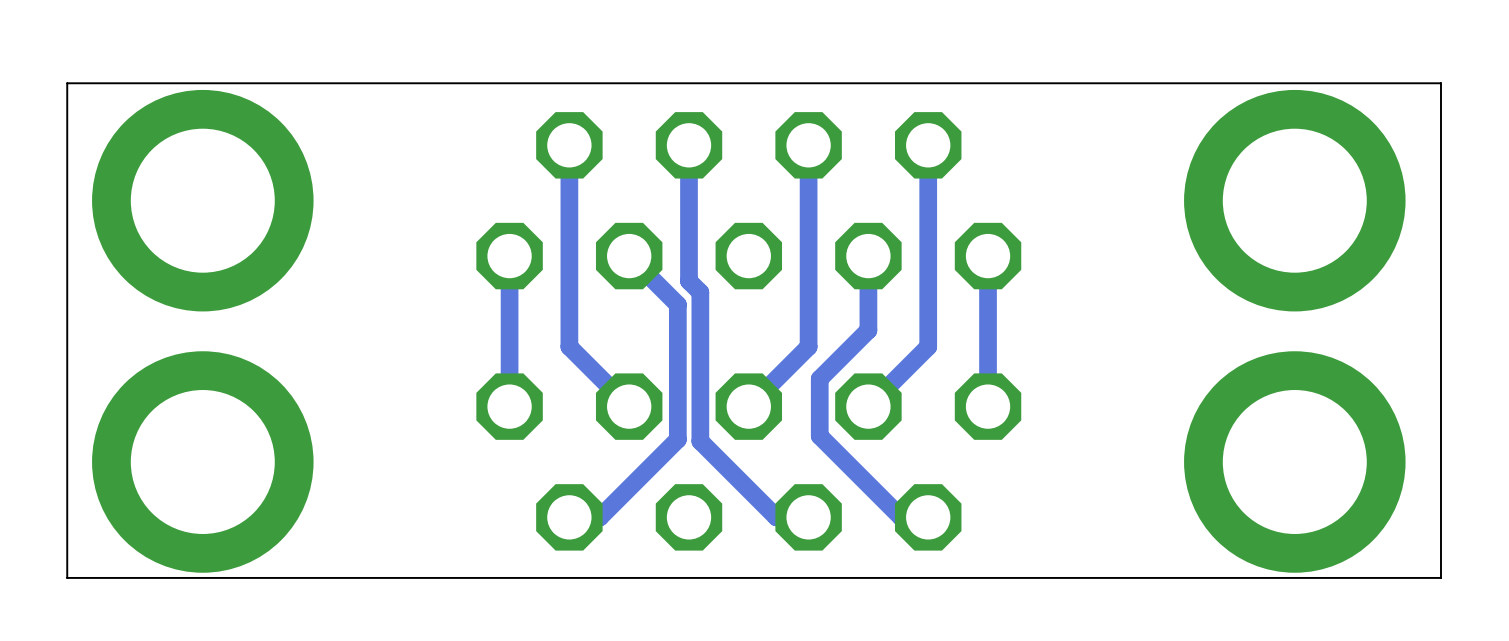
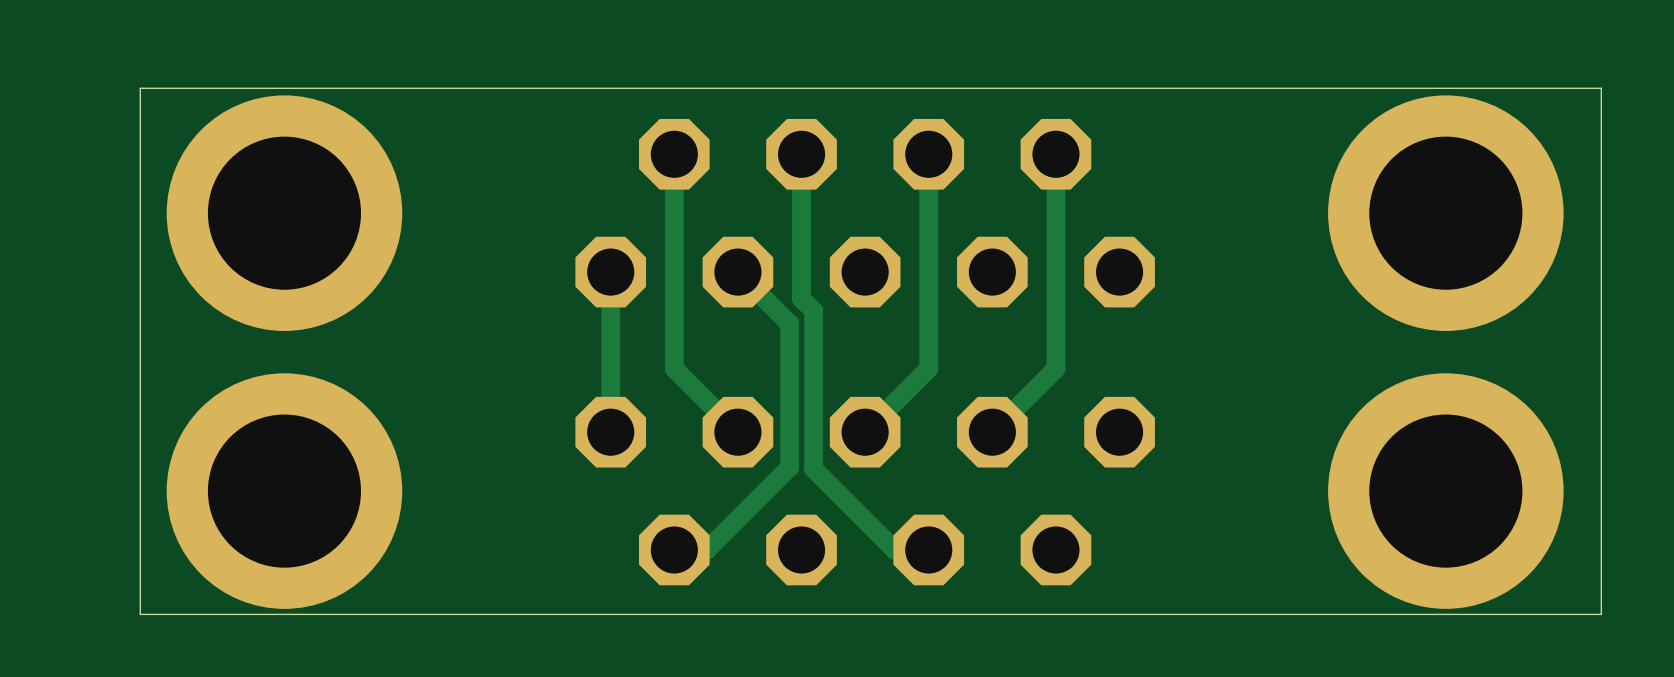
track: (868, 256) (868, 330) (819, 378) (819, 436) (901, 517) (928, 517) -> none
track: (988, 256) (988, 406) -> none

